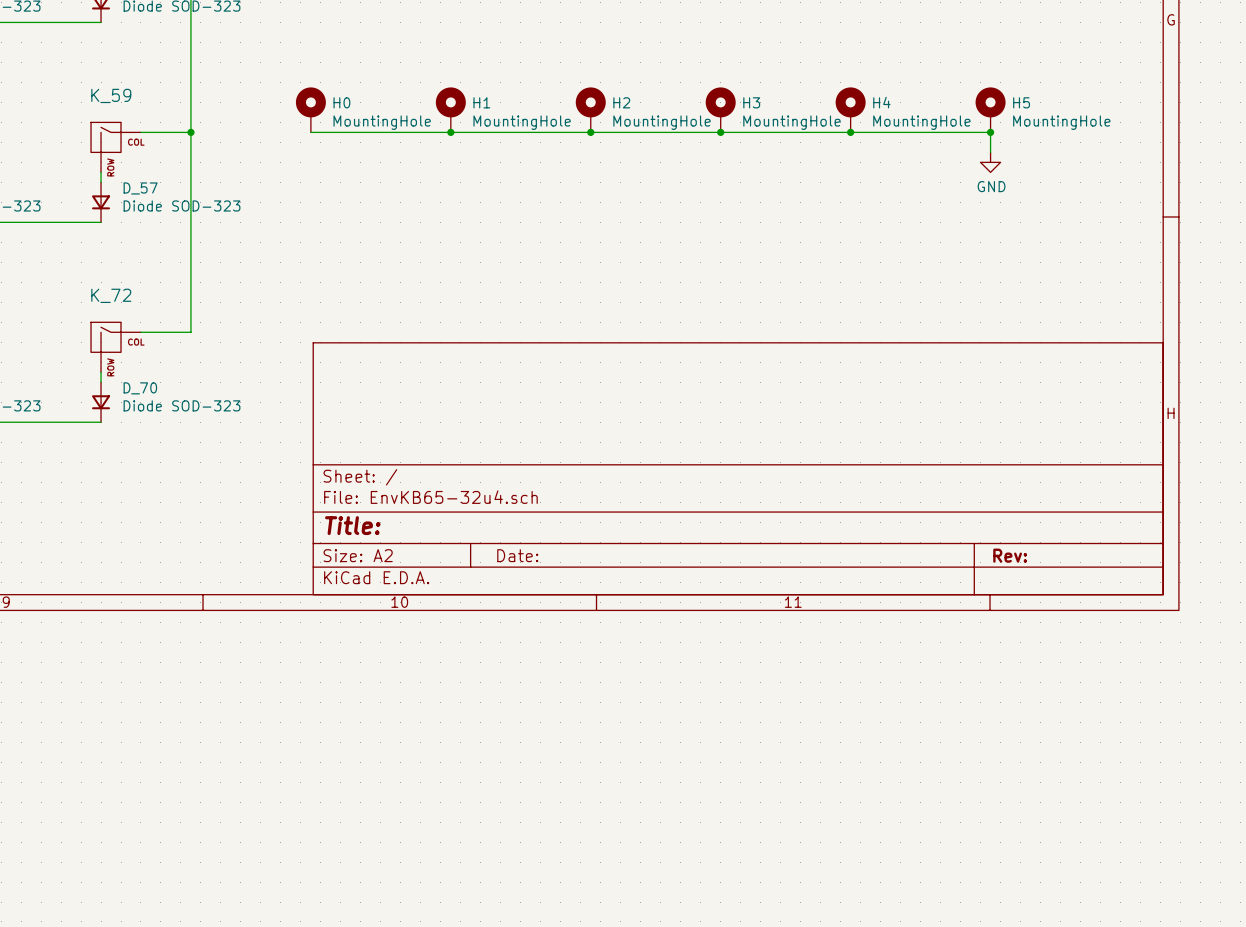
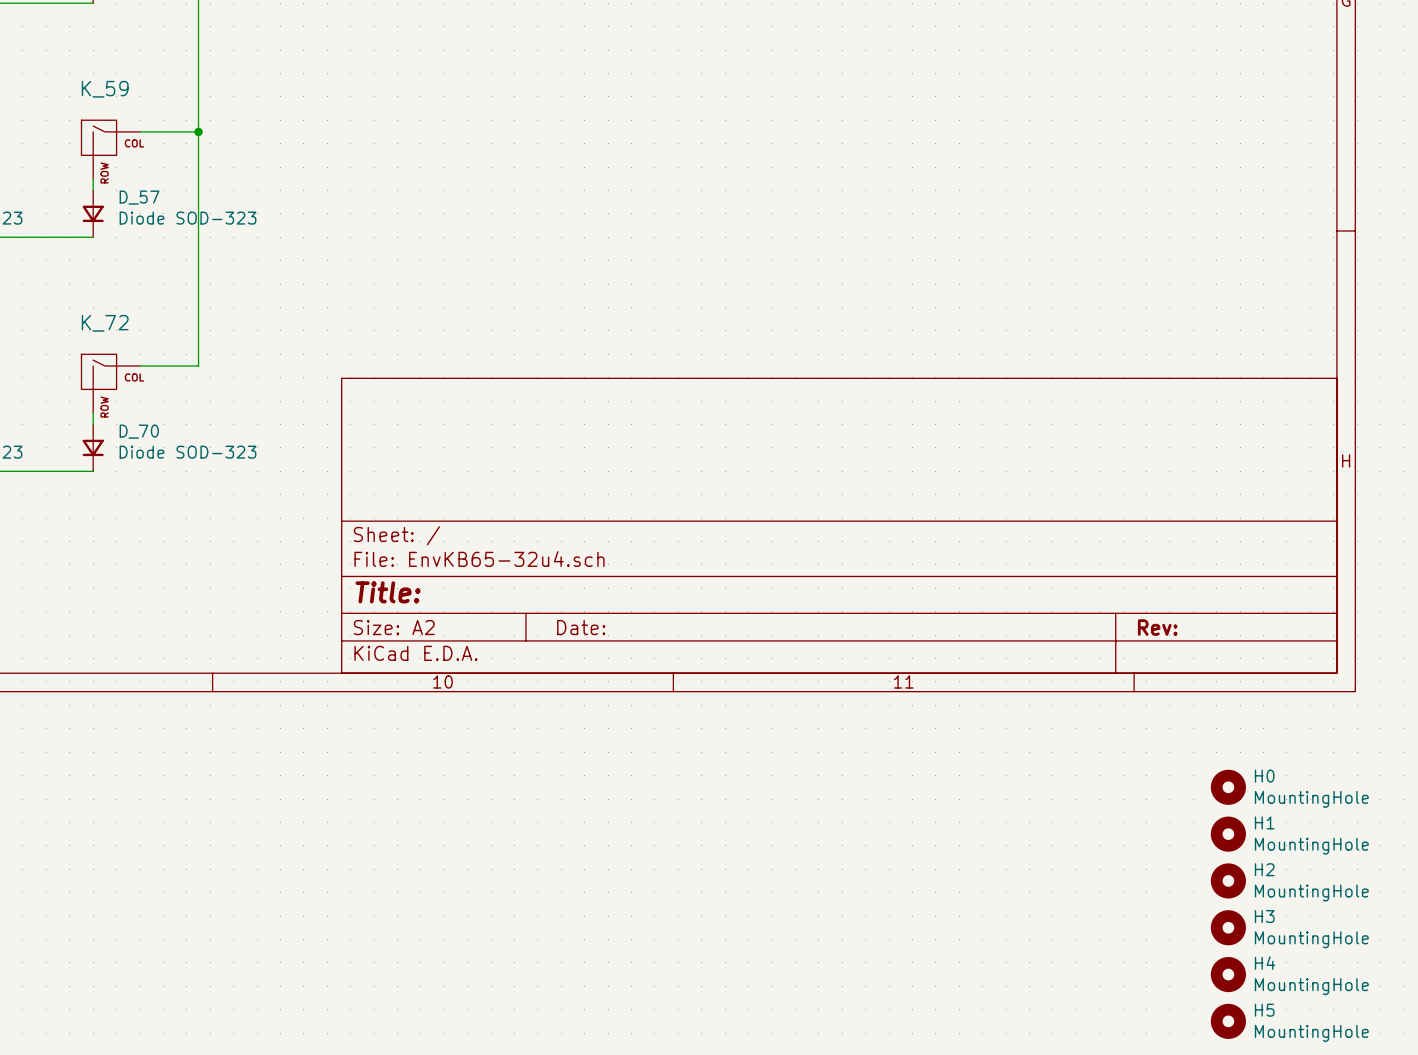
H0 symbol: [295, 87, 326, 133] -> [1210, 769, 1246, 805]
H1 symbol: [435, 87, 466, 133] -> [1210, 816, 1246, 852]
H2 symbol: [575, 87, 606, 133] -> [1210, 863, 1246, 899]
H3 symbol: [705, 87, 736, 133] -> [1210, 910, 1246, 946]
H4 symbol: [835, 87, 866, 133] -> [1210, 957, 1246, 993]
H5 symbol: [975, 87, 1006, 133] -> [1210, 1003, 1246, 1039]
wire: (310, 132) (990, 132) (990, 152) -> none
junction: (450, 132) -> none
junction: (590, 132) -> none
junction: (720, 132) -> none
junction: (850, 132) -> none
junction: (990, 132) -> none
power symbol: GND (990, 162) -> none

